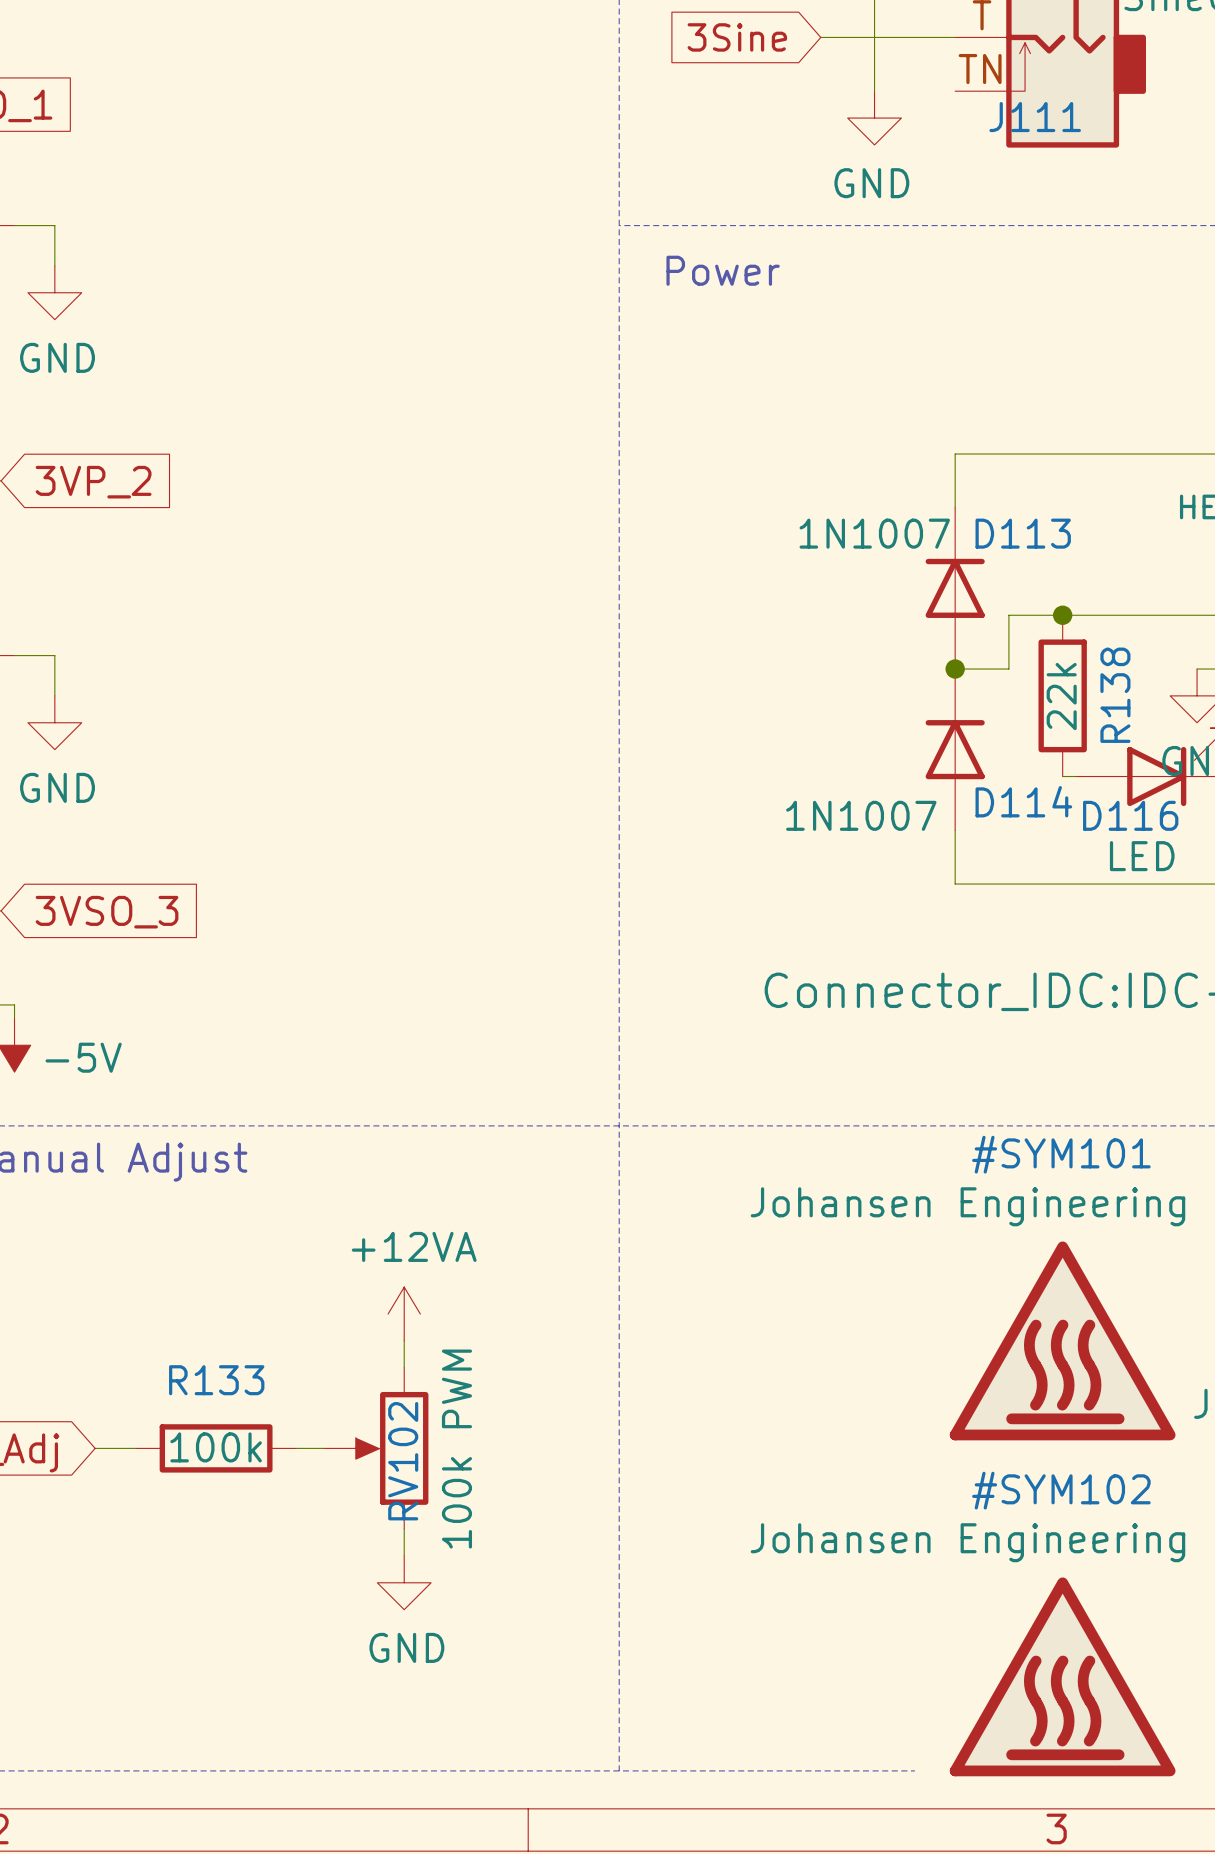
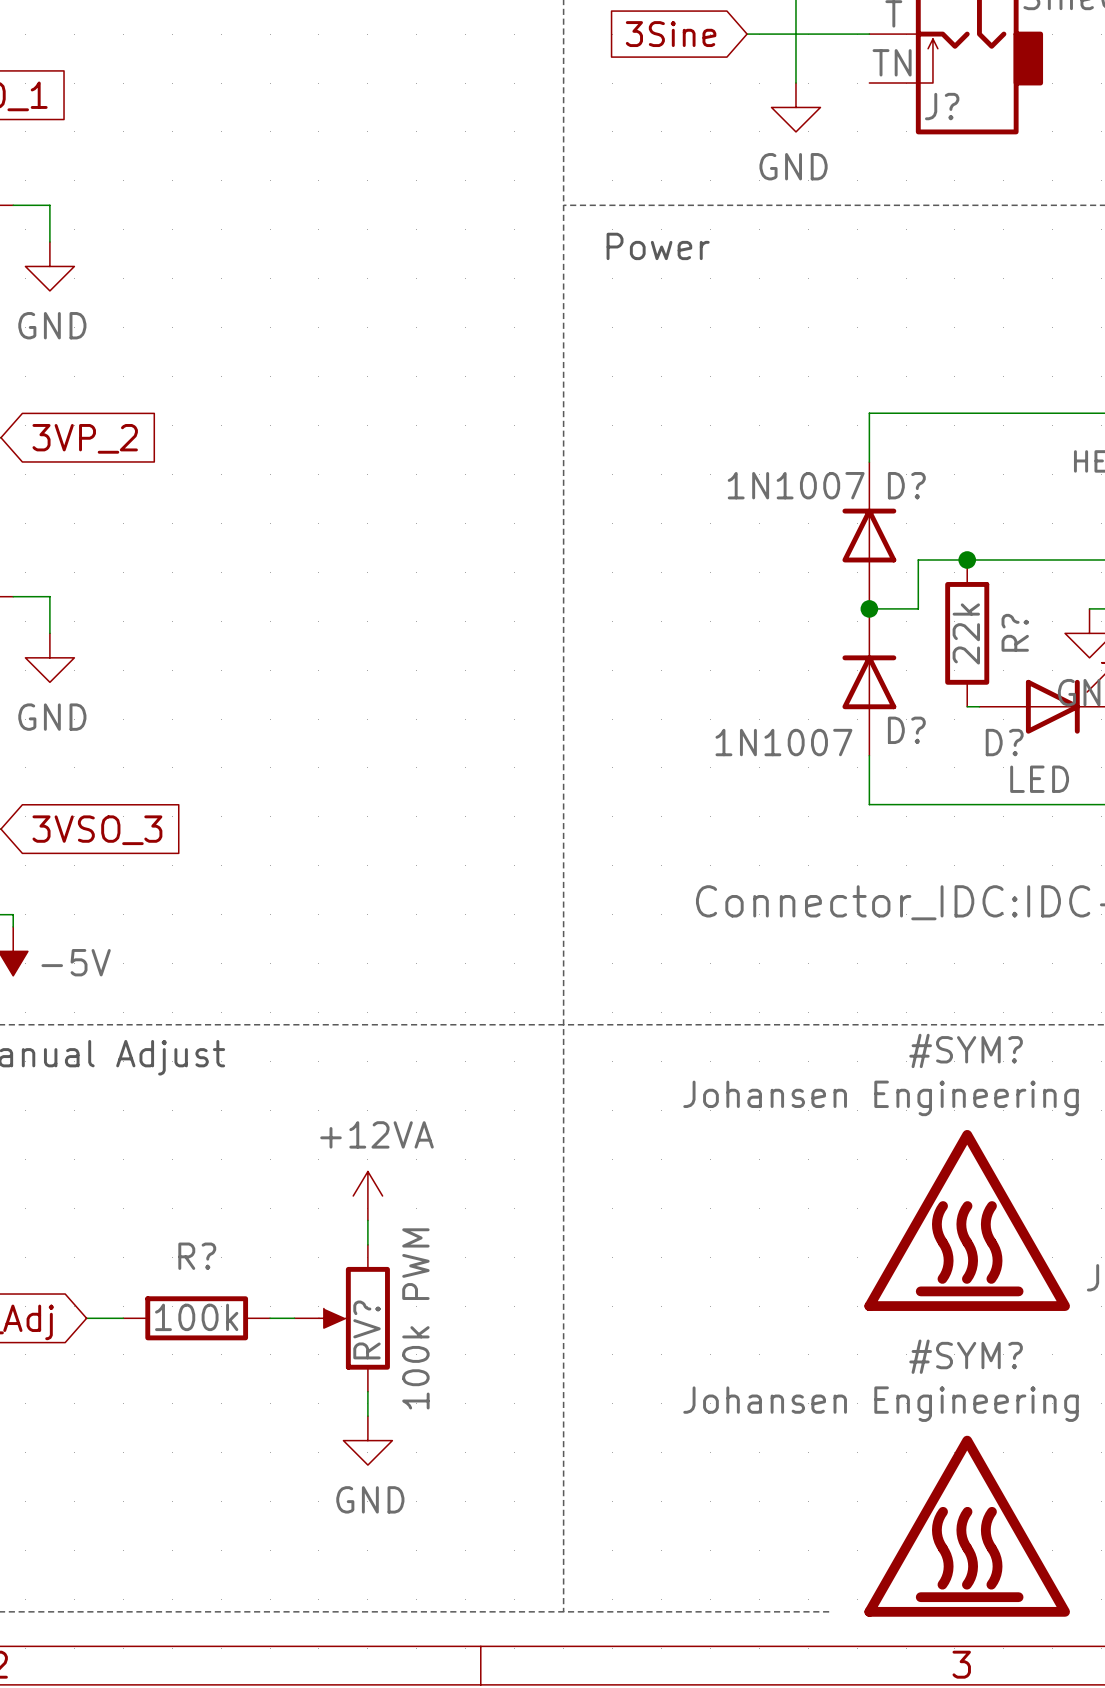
J111 name: J111 (1035, 117) -> J? (942, 106)
D113 name: D113 (1023, 533) -> D? (906, 485)
R138 name: R138 (1115, 695) -> R? (1015, 632)
D114 name: D114 (1023, 801) -> D? (906, 730)
D116 name: D116 (1130, 815) -> D? (1004, 742)
#SYM101 name: #SYM101 (1061, 1154) -> #SYM? (966, 1050)
R133 name: R133 (216, 1380) -> R? (197, 1256)
RV102 name: RV102 (403, 1461) -> RV? (367, 1329)
#SYM102 name: #SYM102 (1061, 1490) -> #SYM? (966, 1356)

